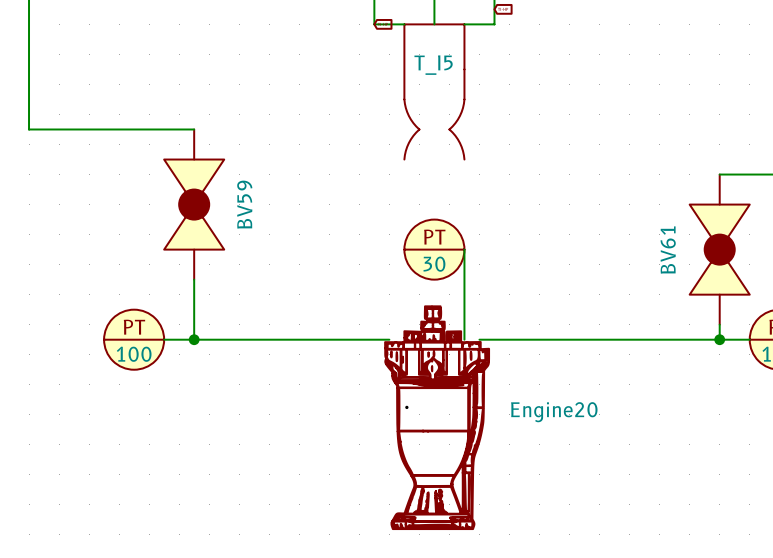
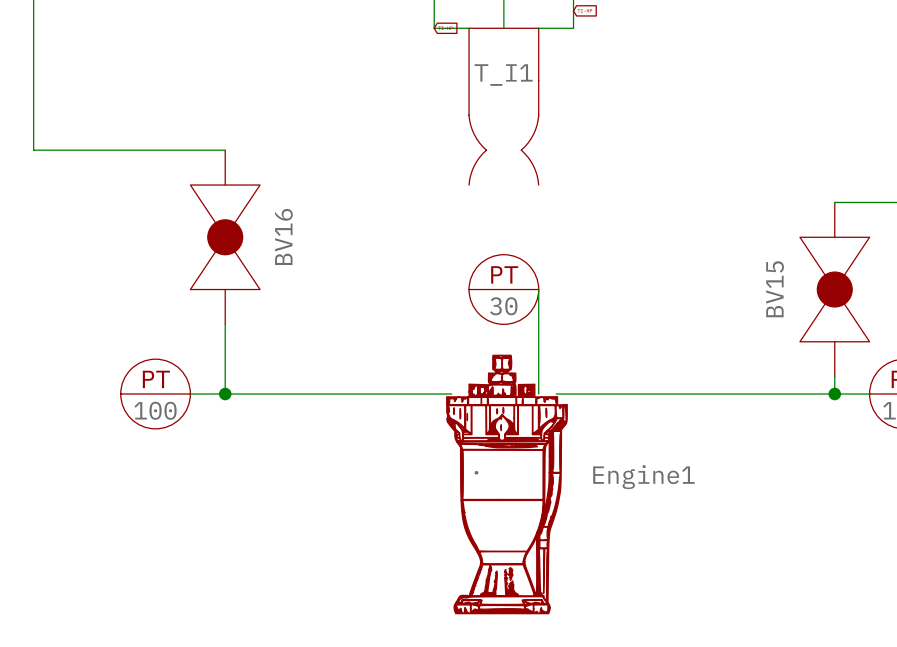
T_I5 name: T_I5 (433, 65) -> T_I1 (503, 75)
BV59 name: BV59 (244, 204) -> BV16 (283, 236)
BV61 name: BV61 (668, 250) -> BV15 (775, 289)
Engine20 name: Engine20 (554, 412) -> Engine1 (643, 477)

